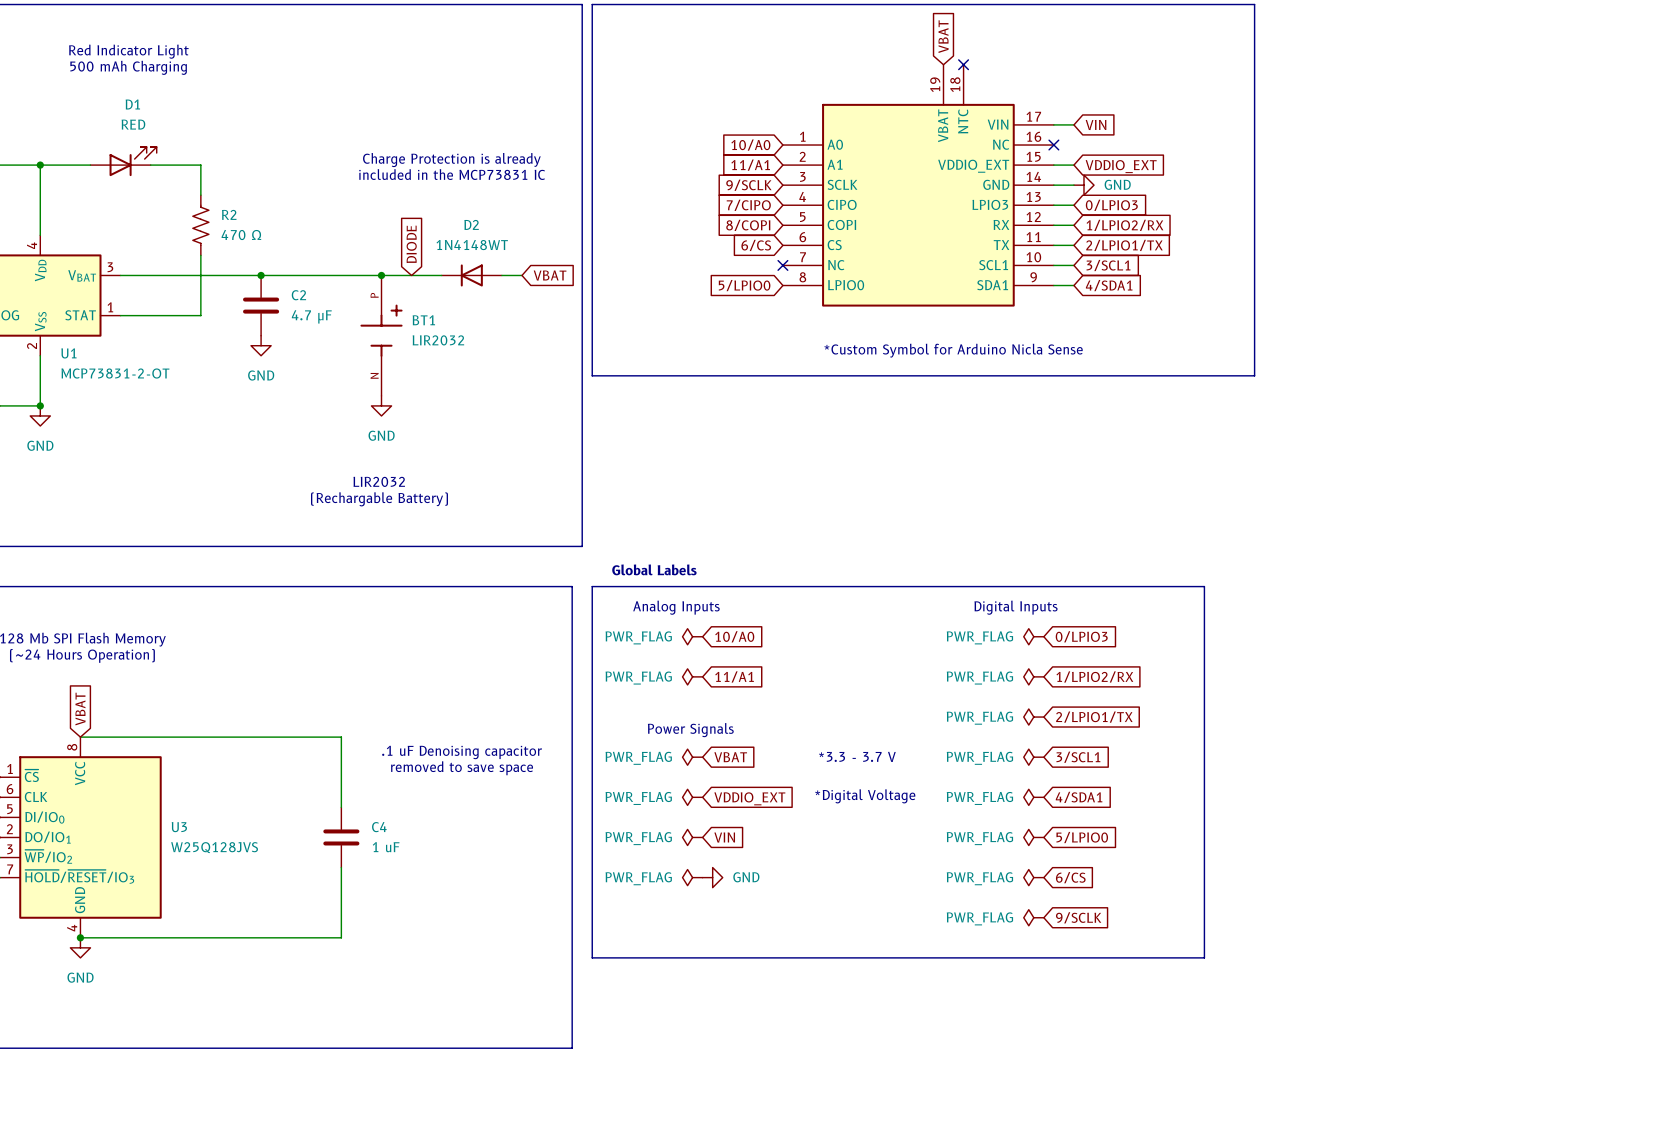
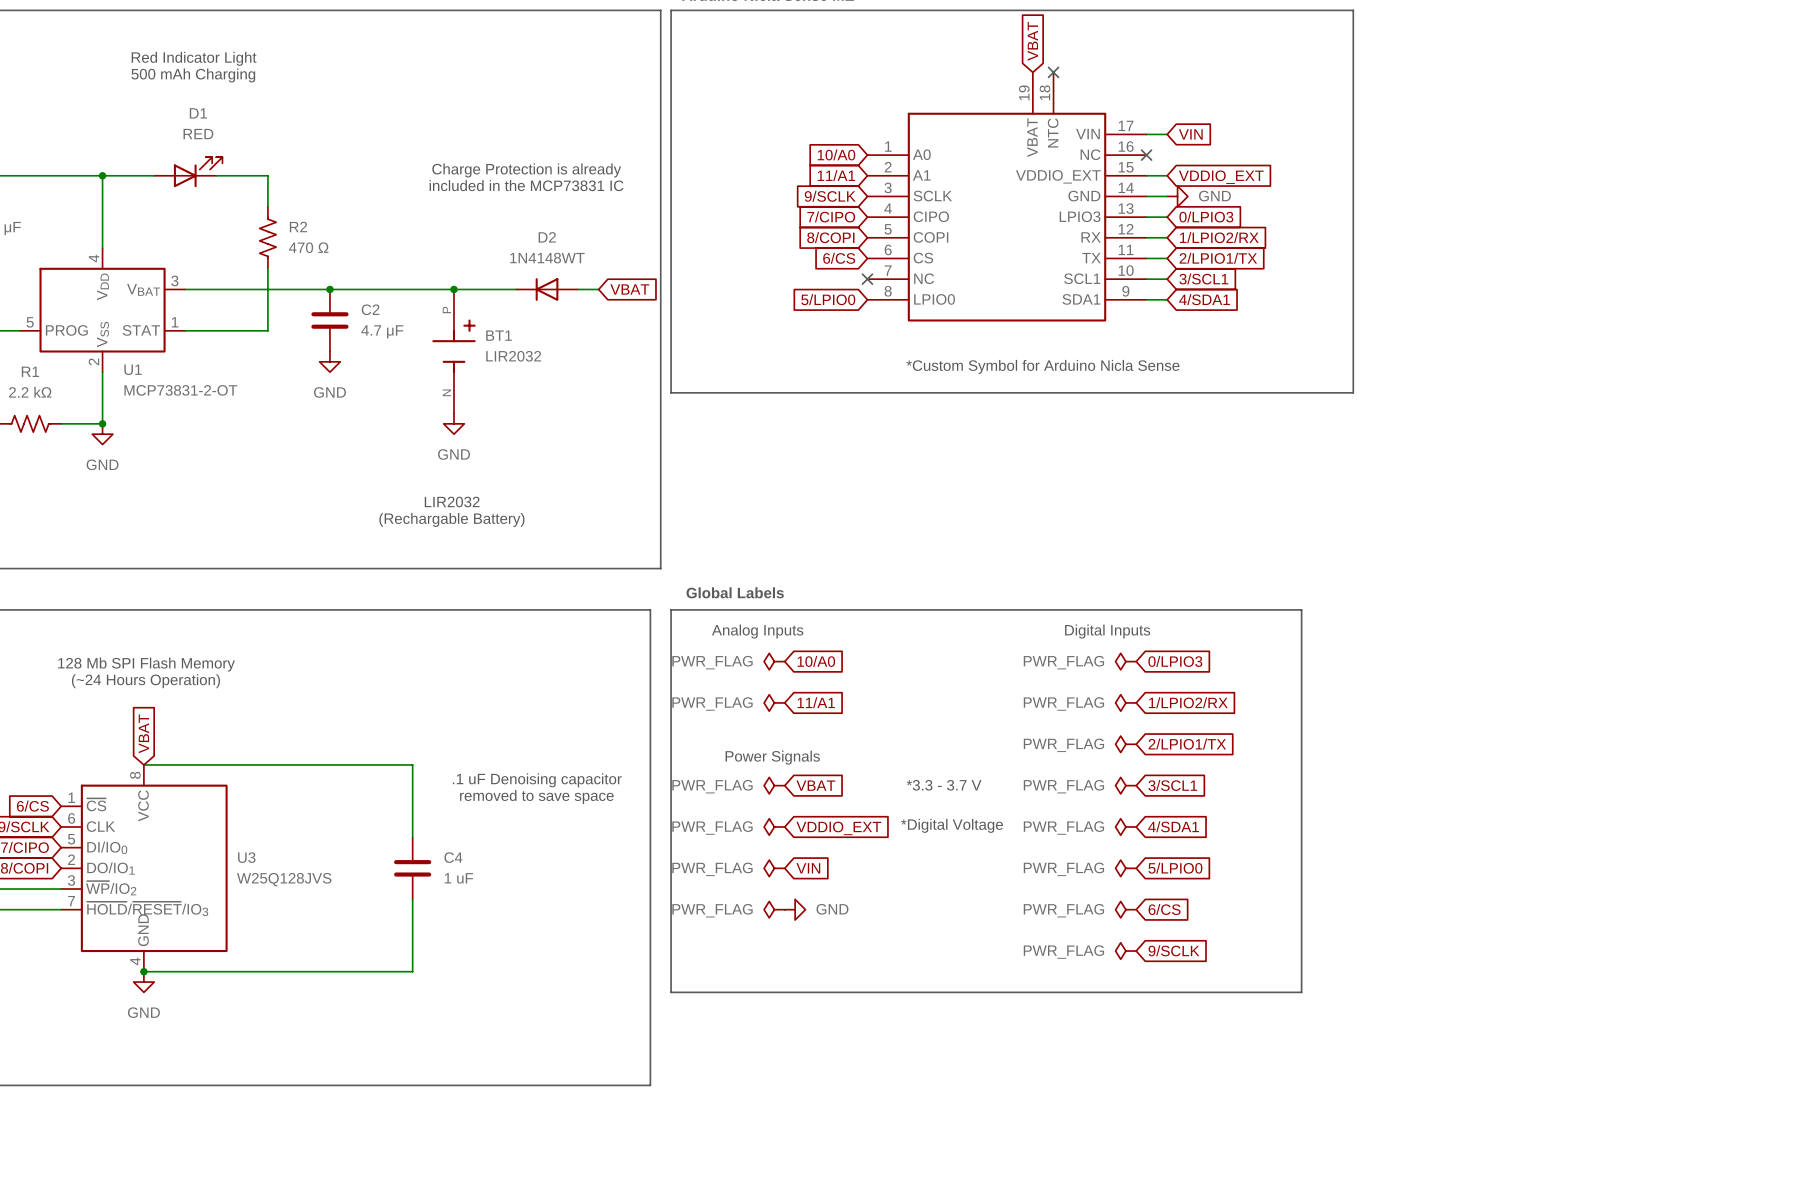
global label: DIODE (411, 244) -> none

